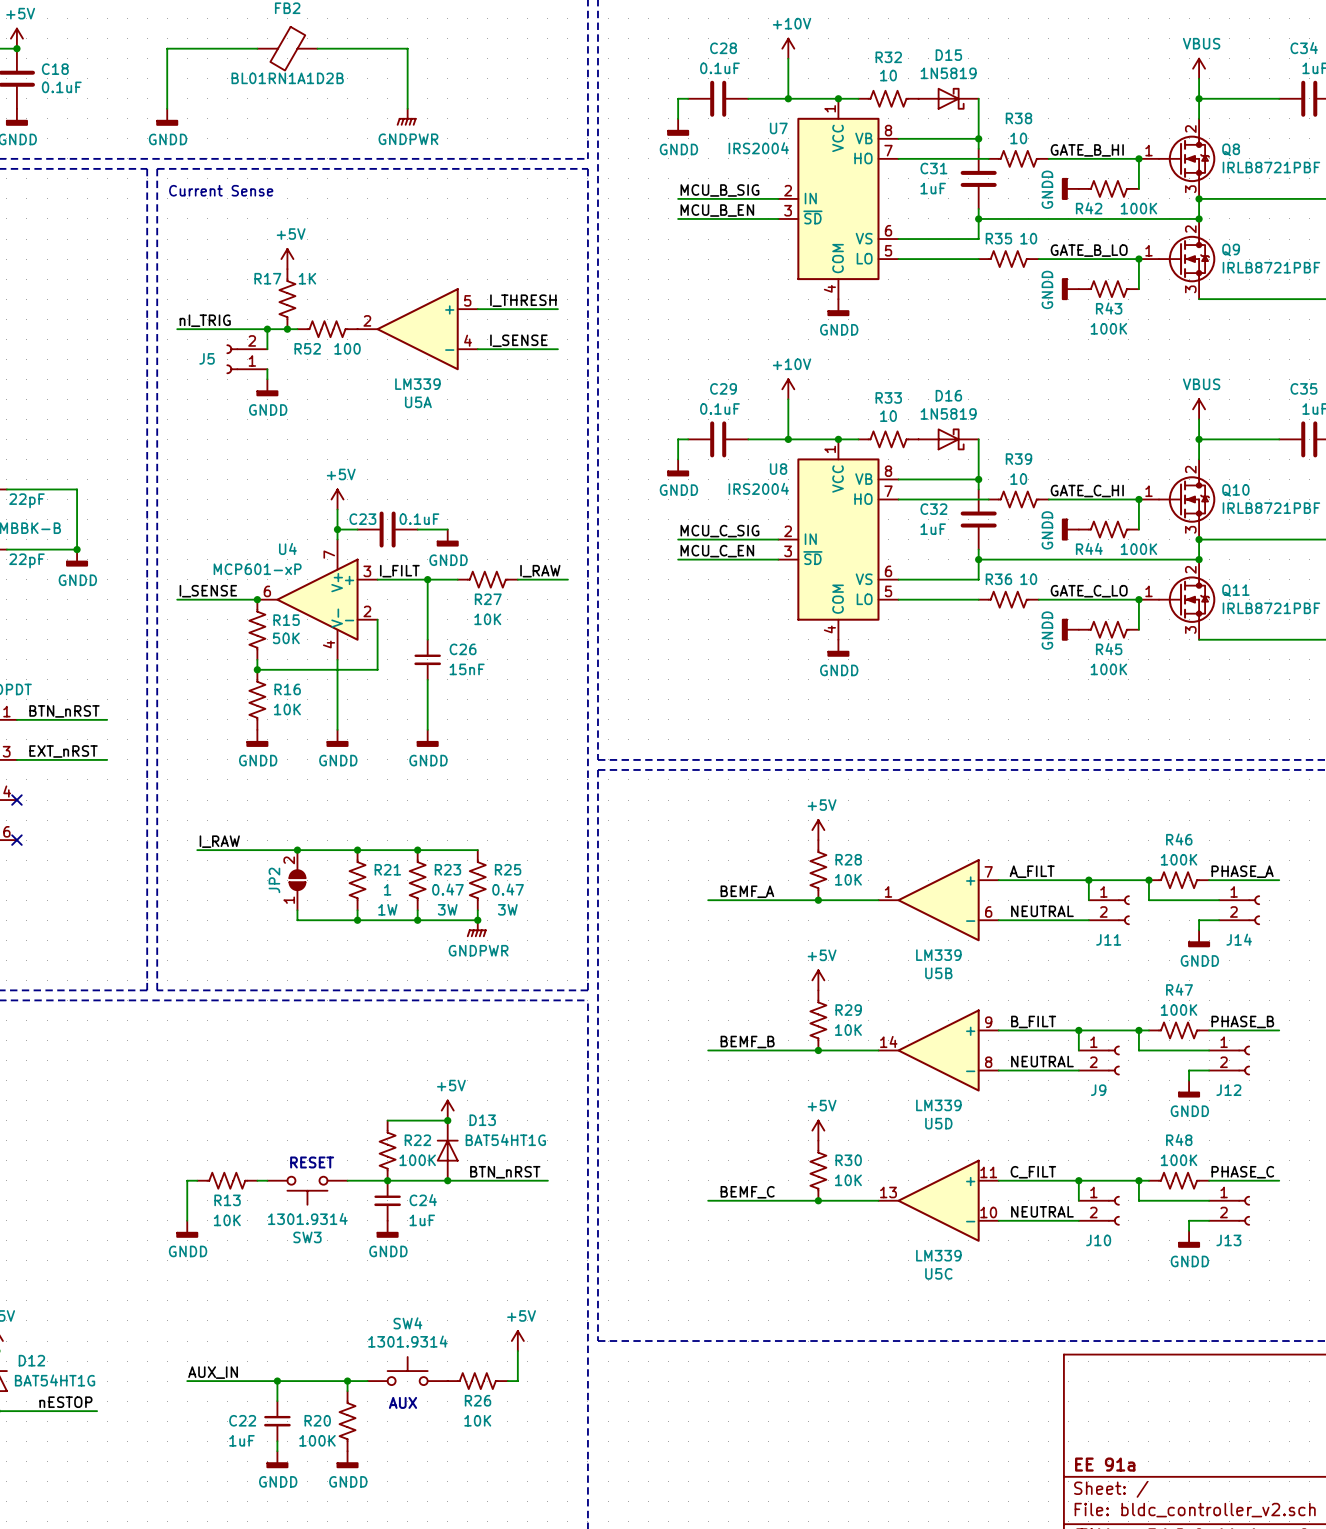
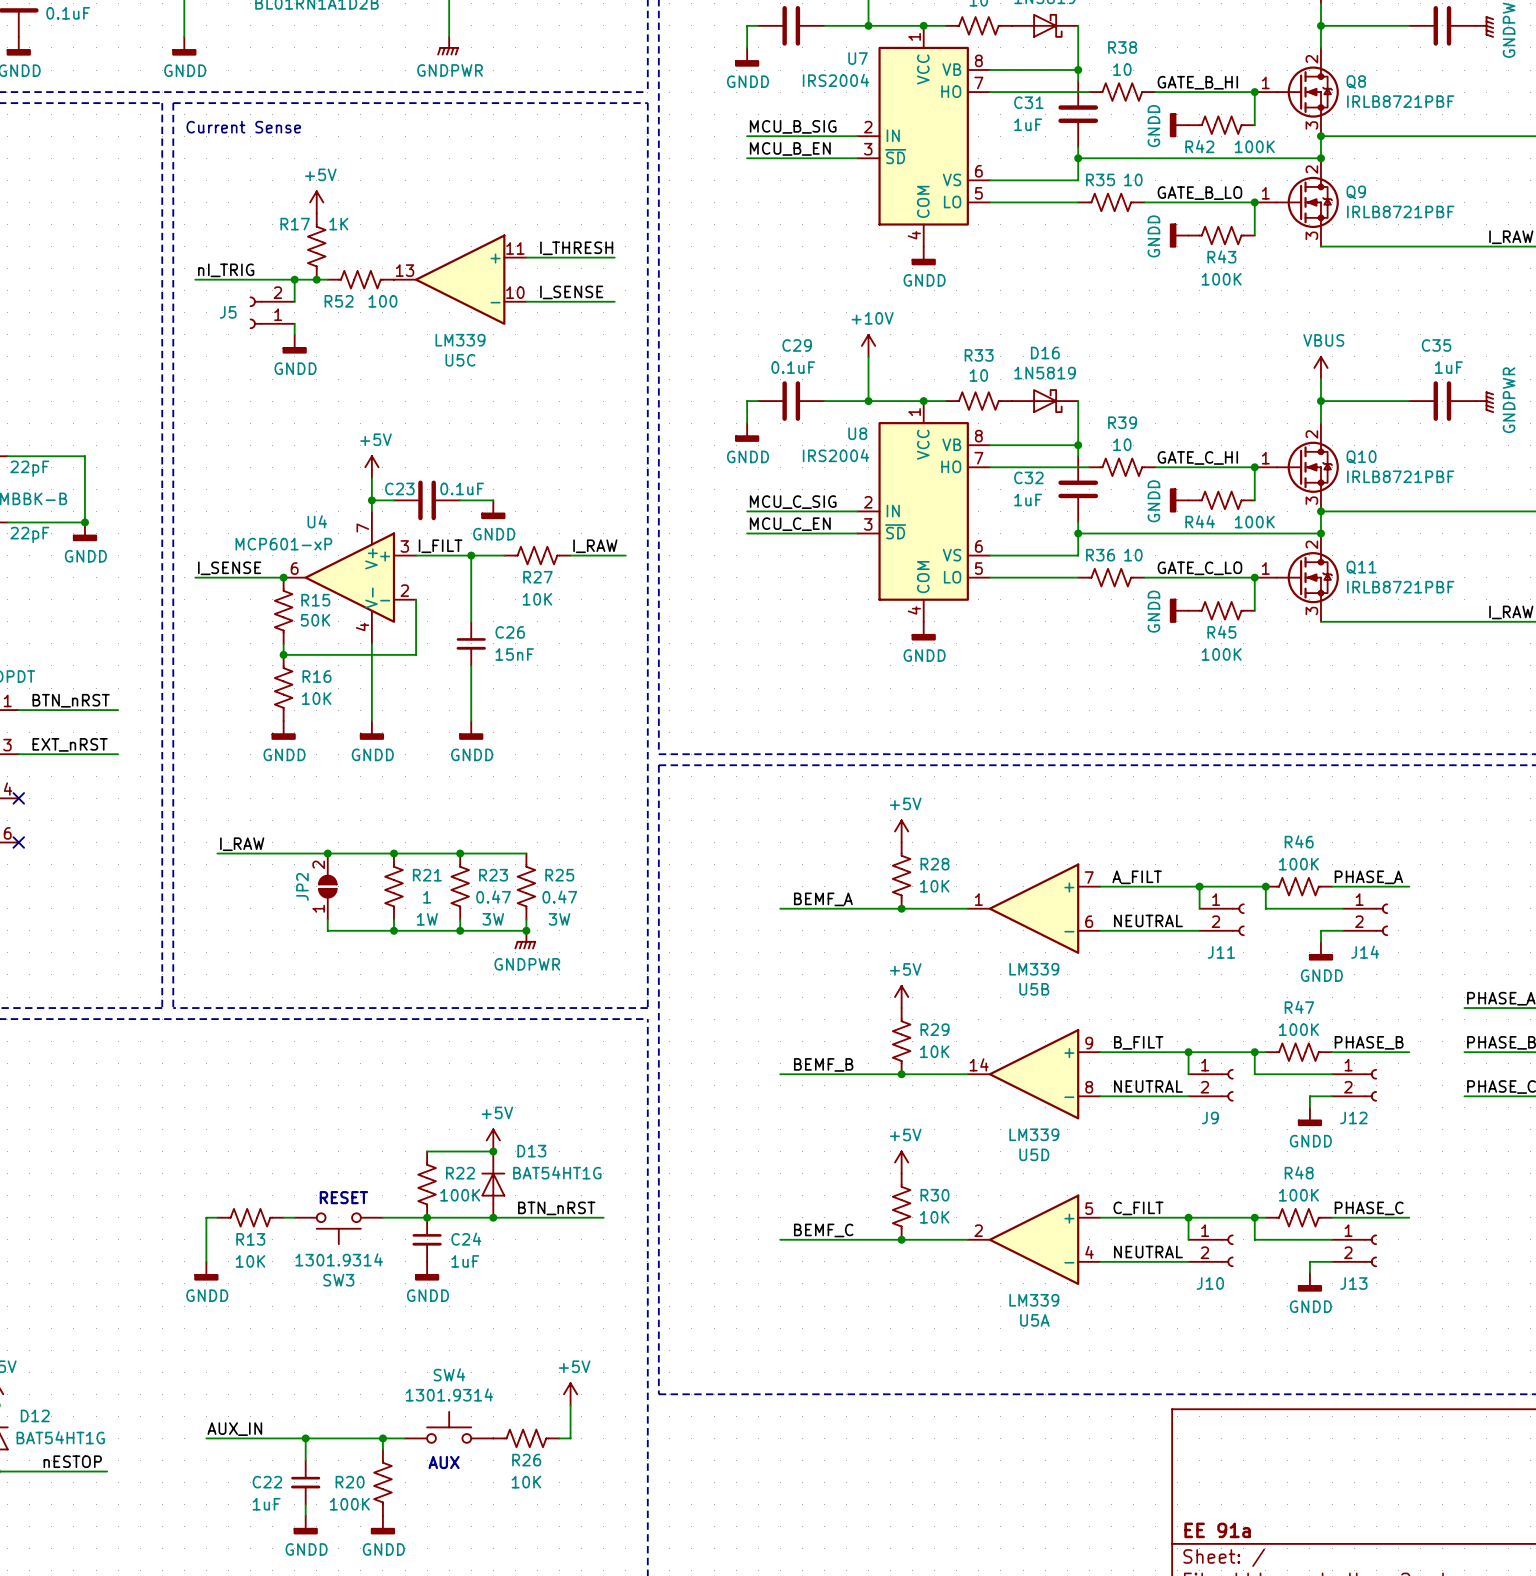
U5A position: (417, 329) -> (1034, 1239)
U5C position: (938, 1200) -> (460, 279)

